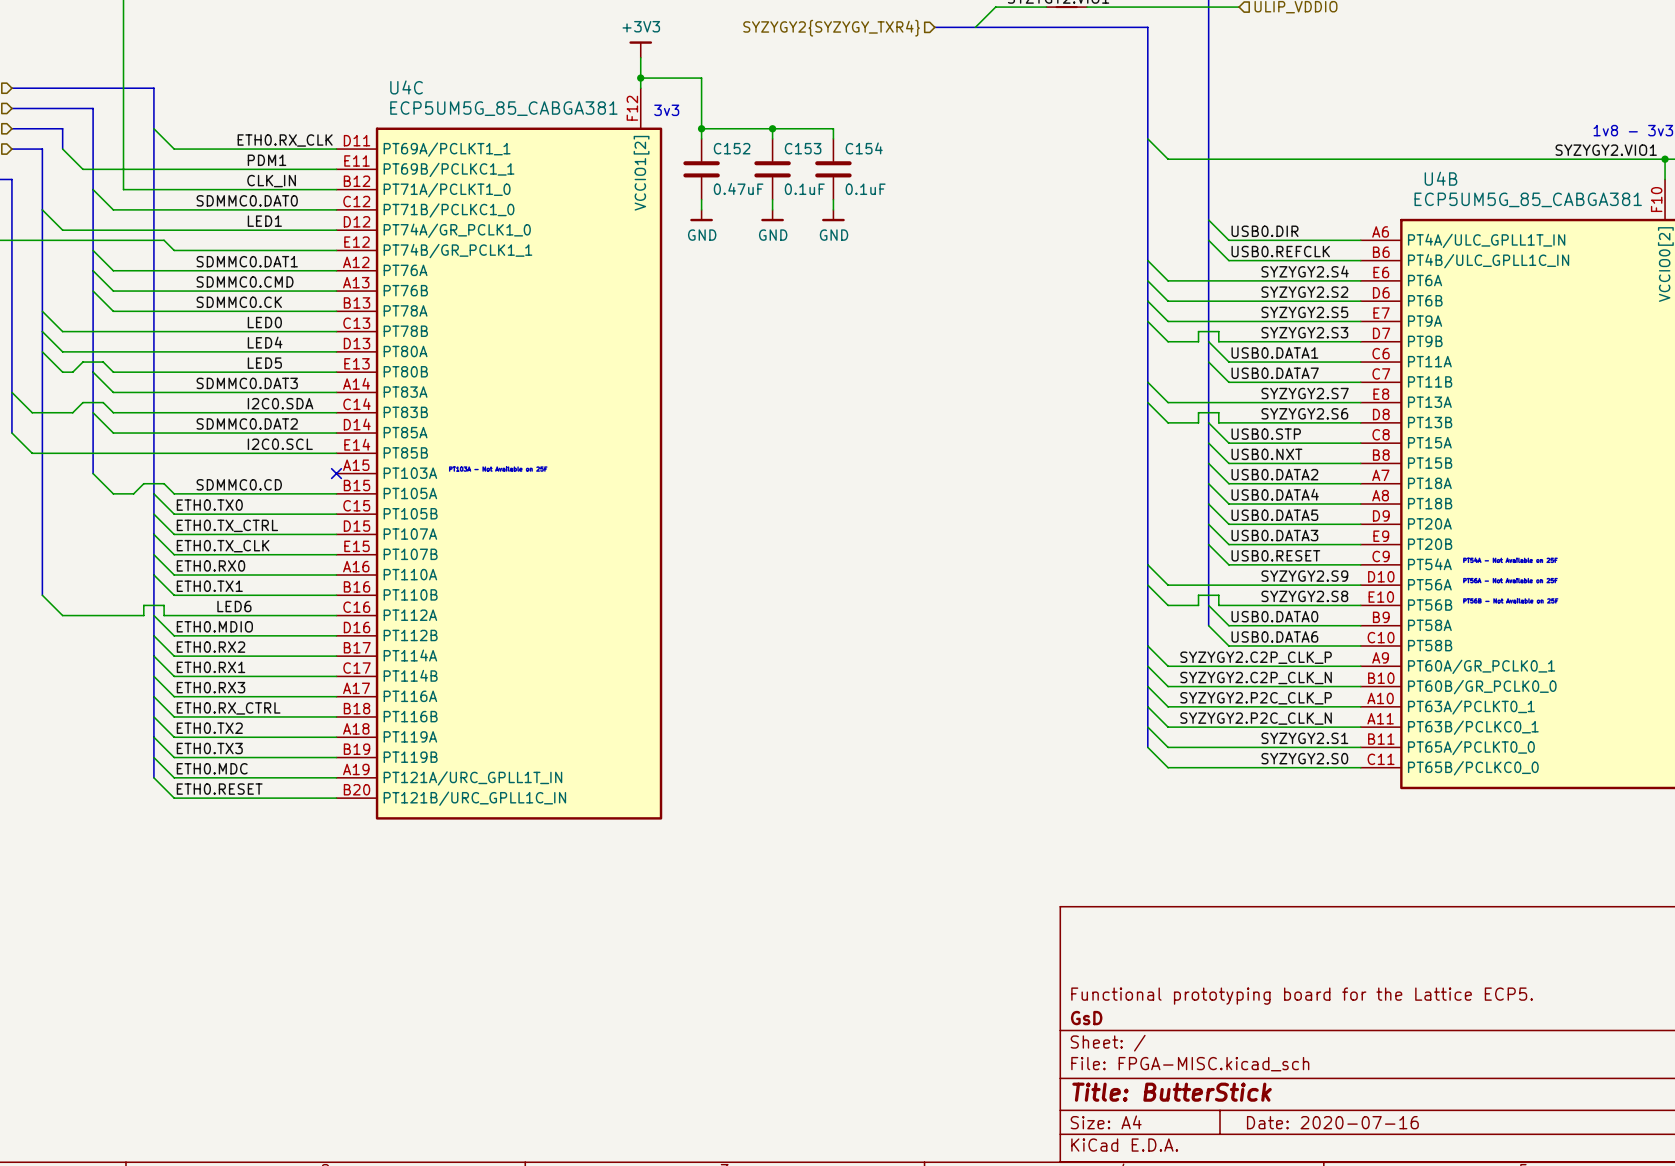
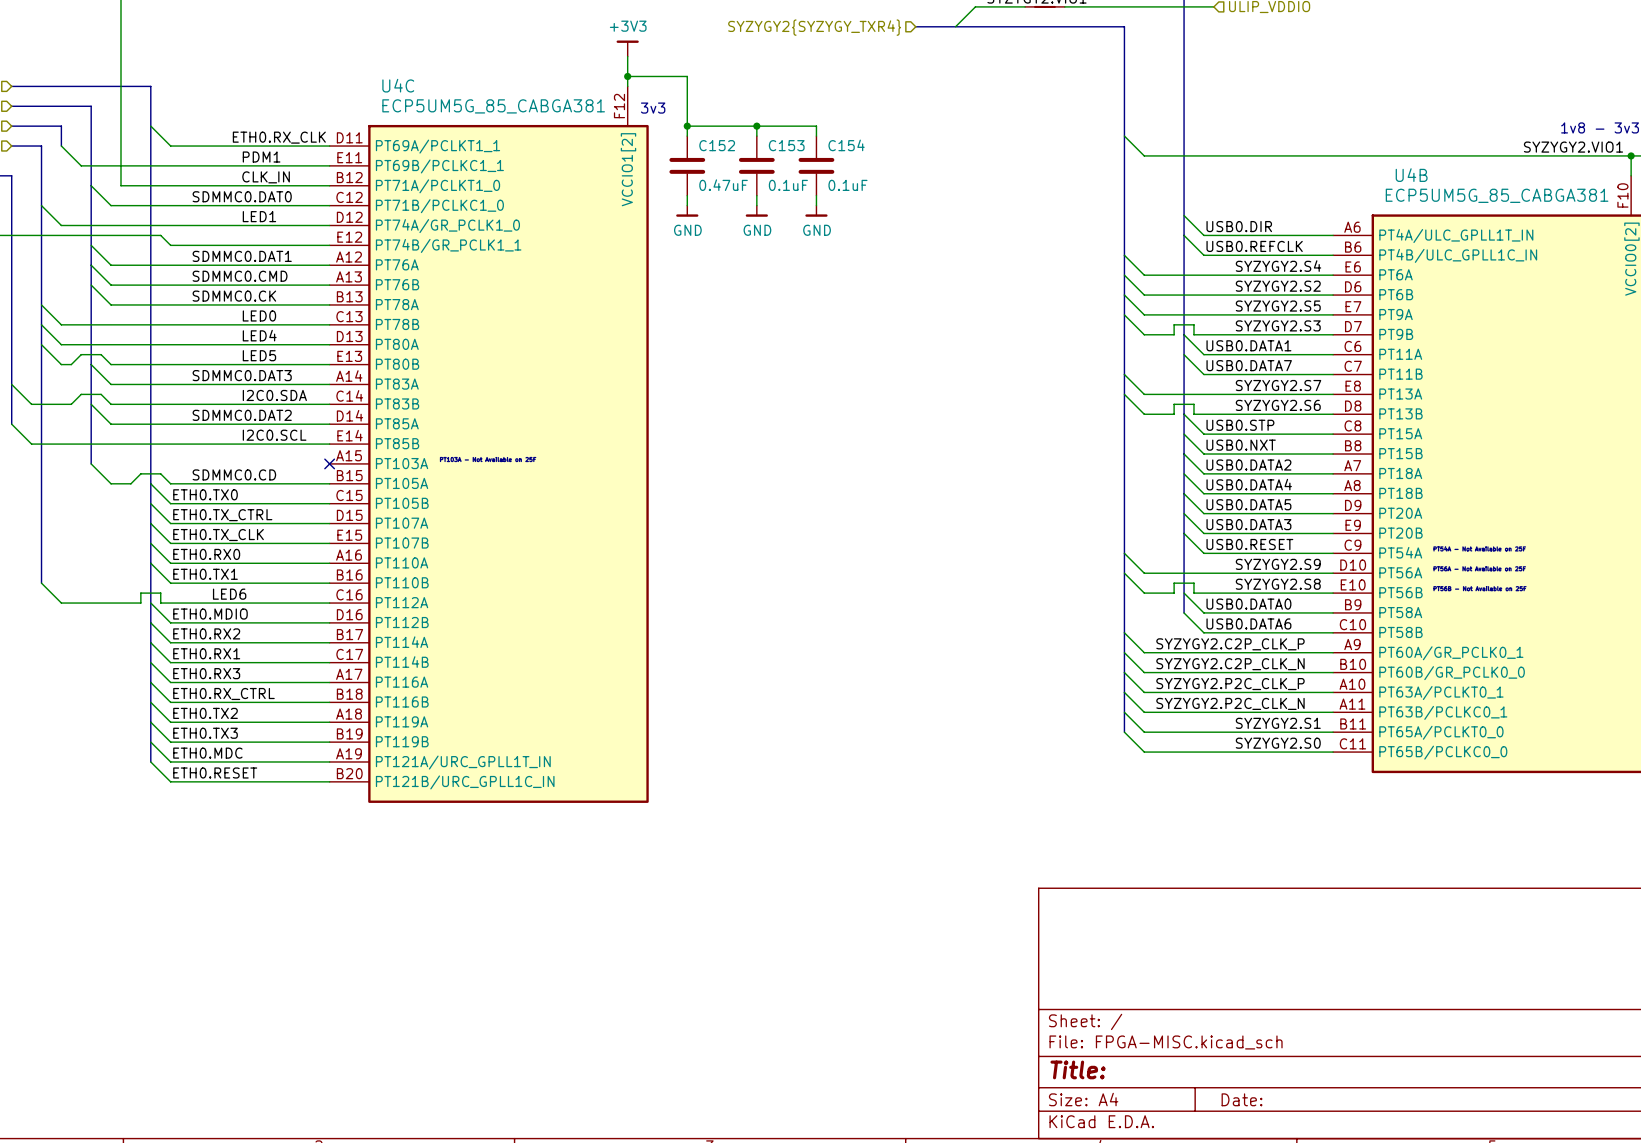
title block: Functional prototyping board for the Lattice ECP5. (1302, 996) -> none
title block: GsD (1086, 1018) -> none
title block: Title: ButterStick (1172, 1092) -> Title: (1078, 1069)
title block: Date: 2020-07-16 (1332, 1122) -> Date: (1242, 1099)

